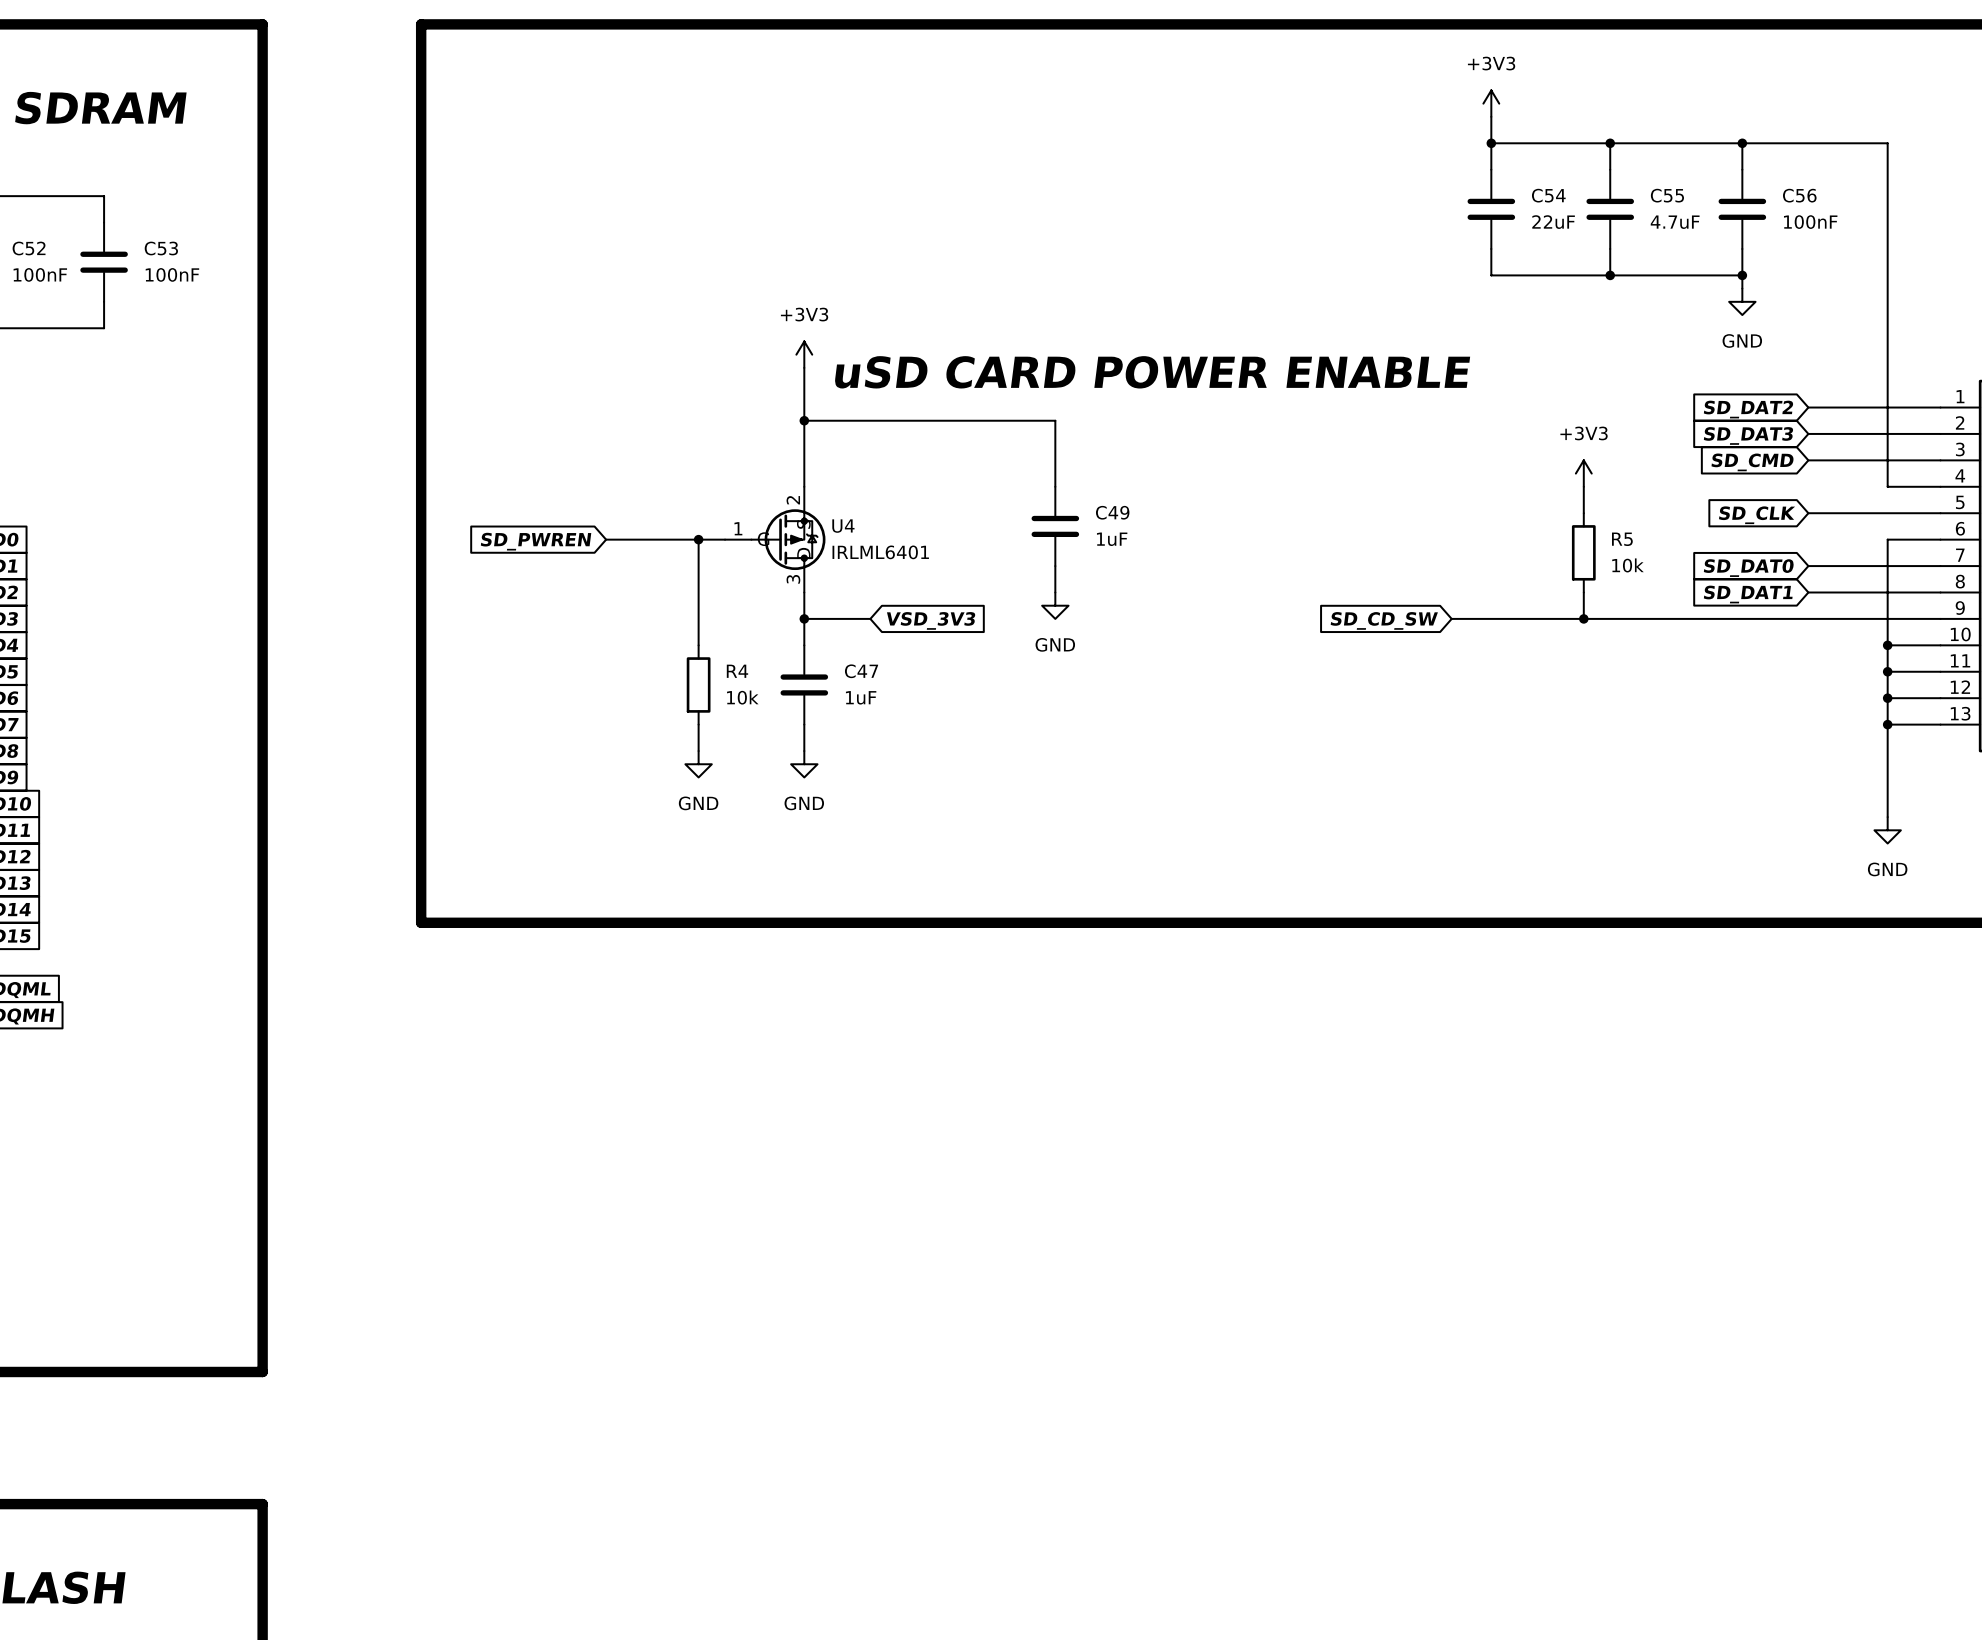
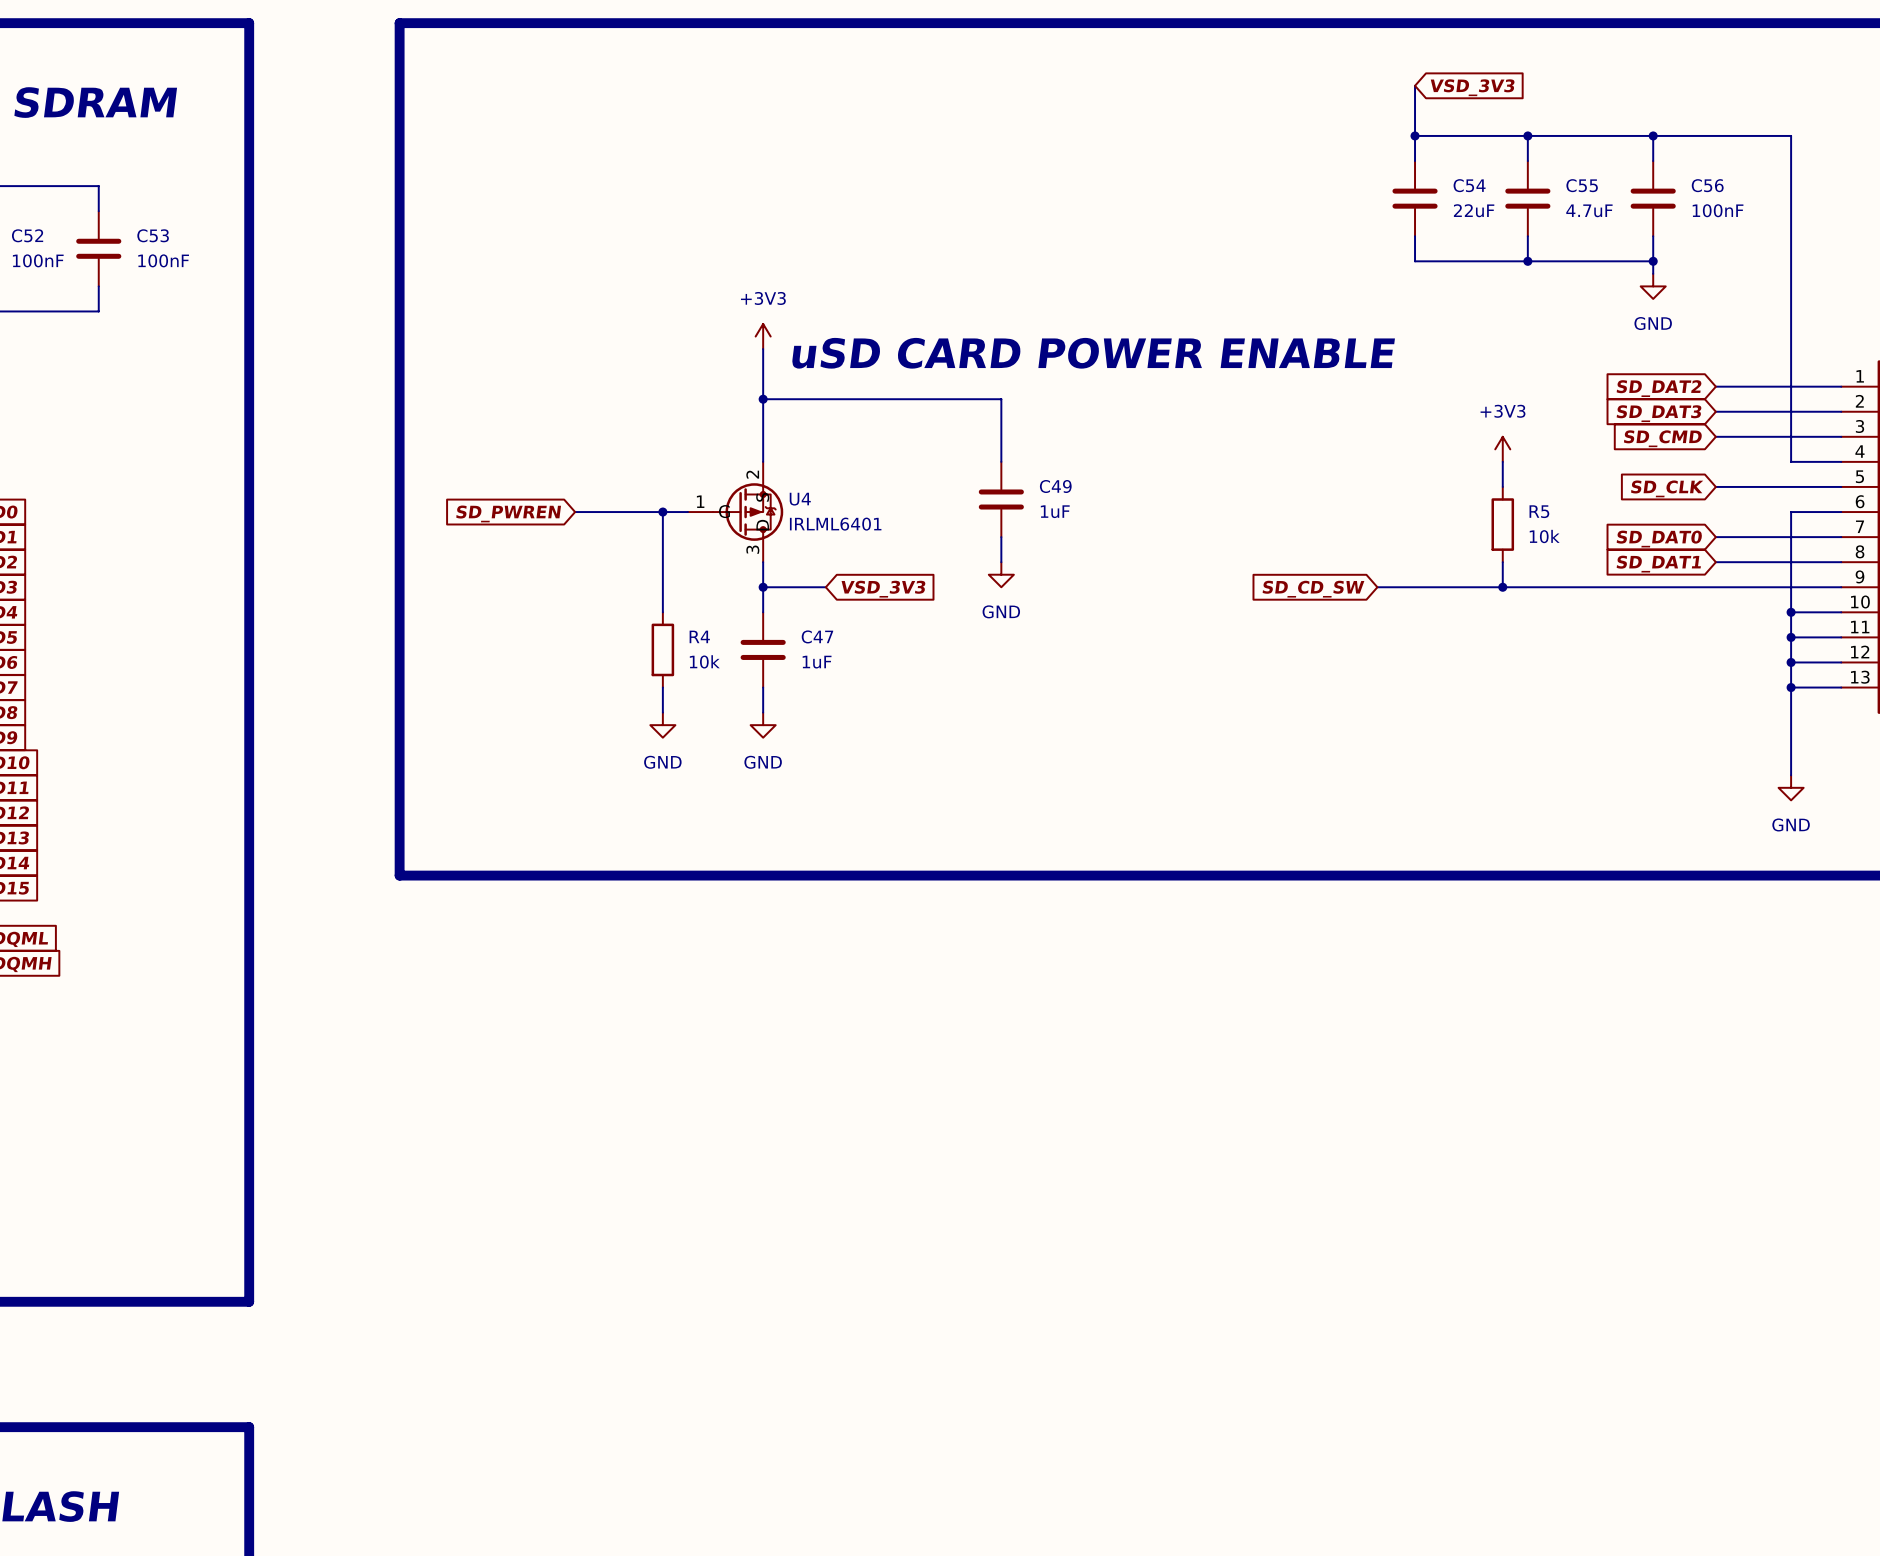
global label: none -> VSD_3V3 (1472, 87)
power symbol: +3V3 (1491, 103) -> none

